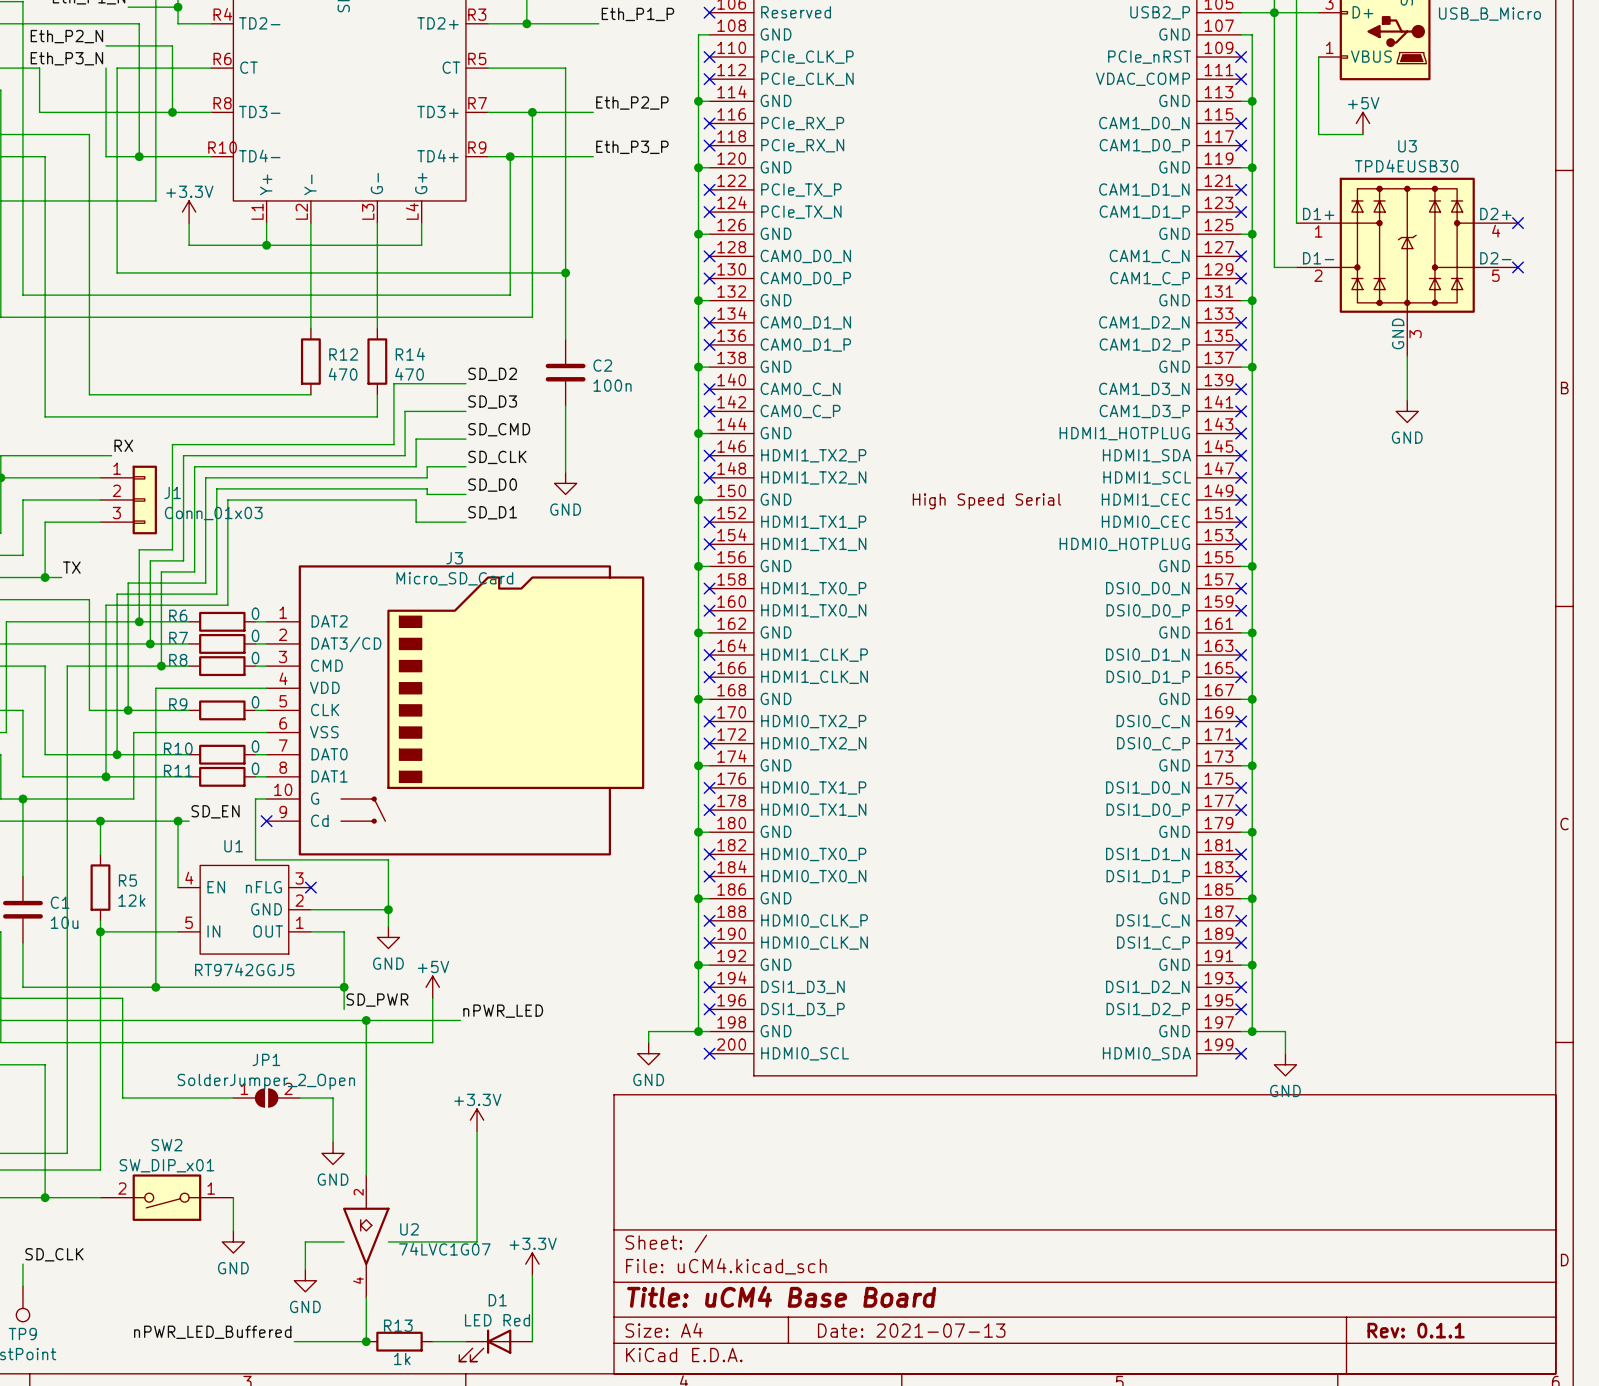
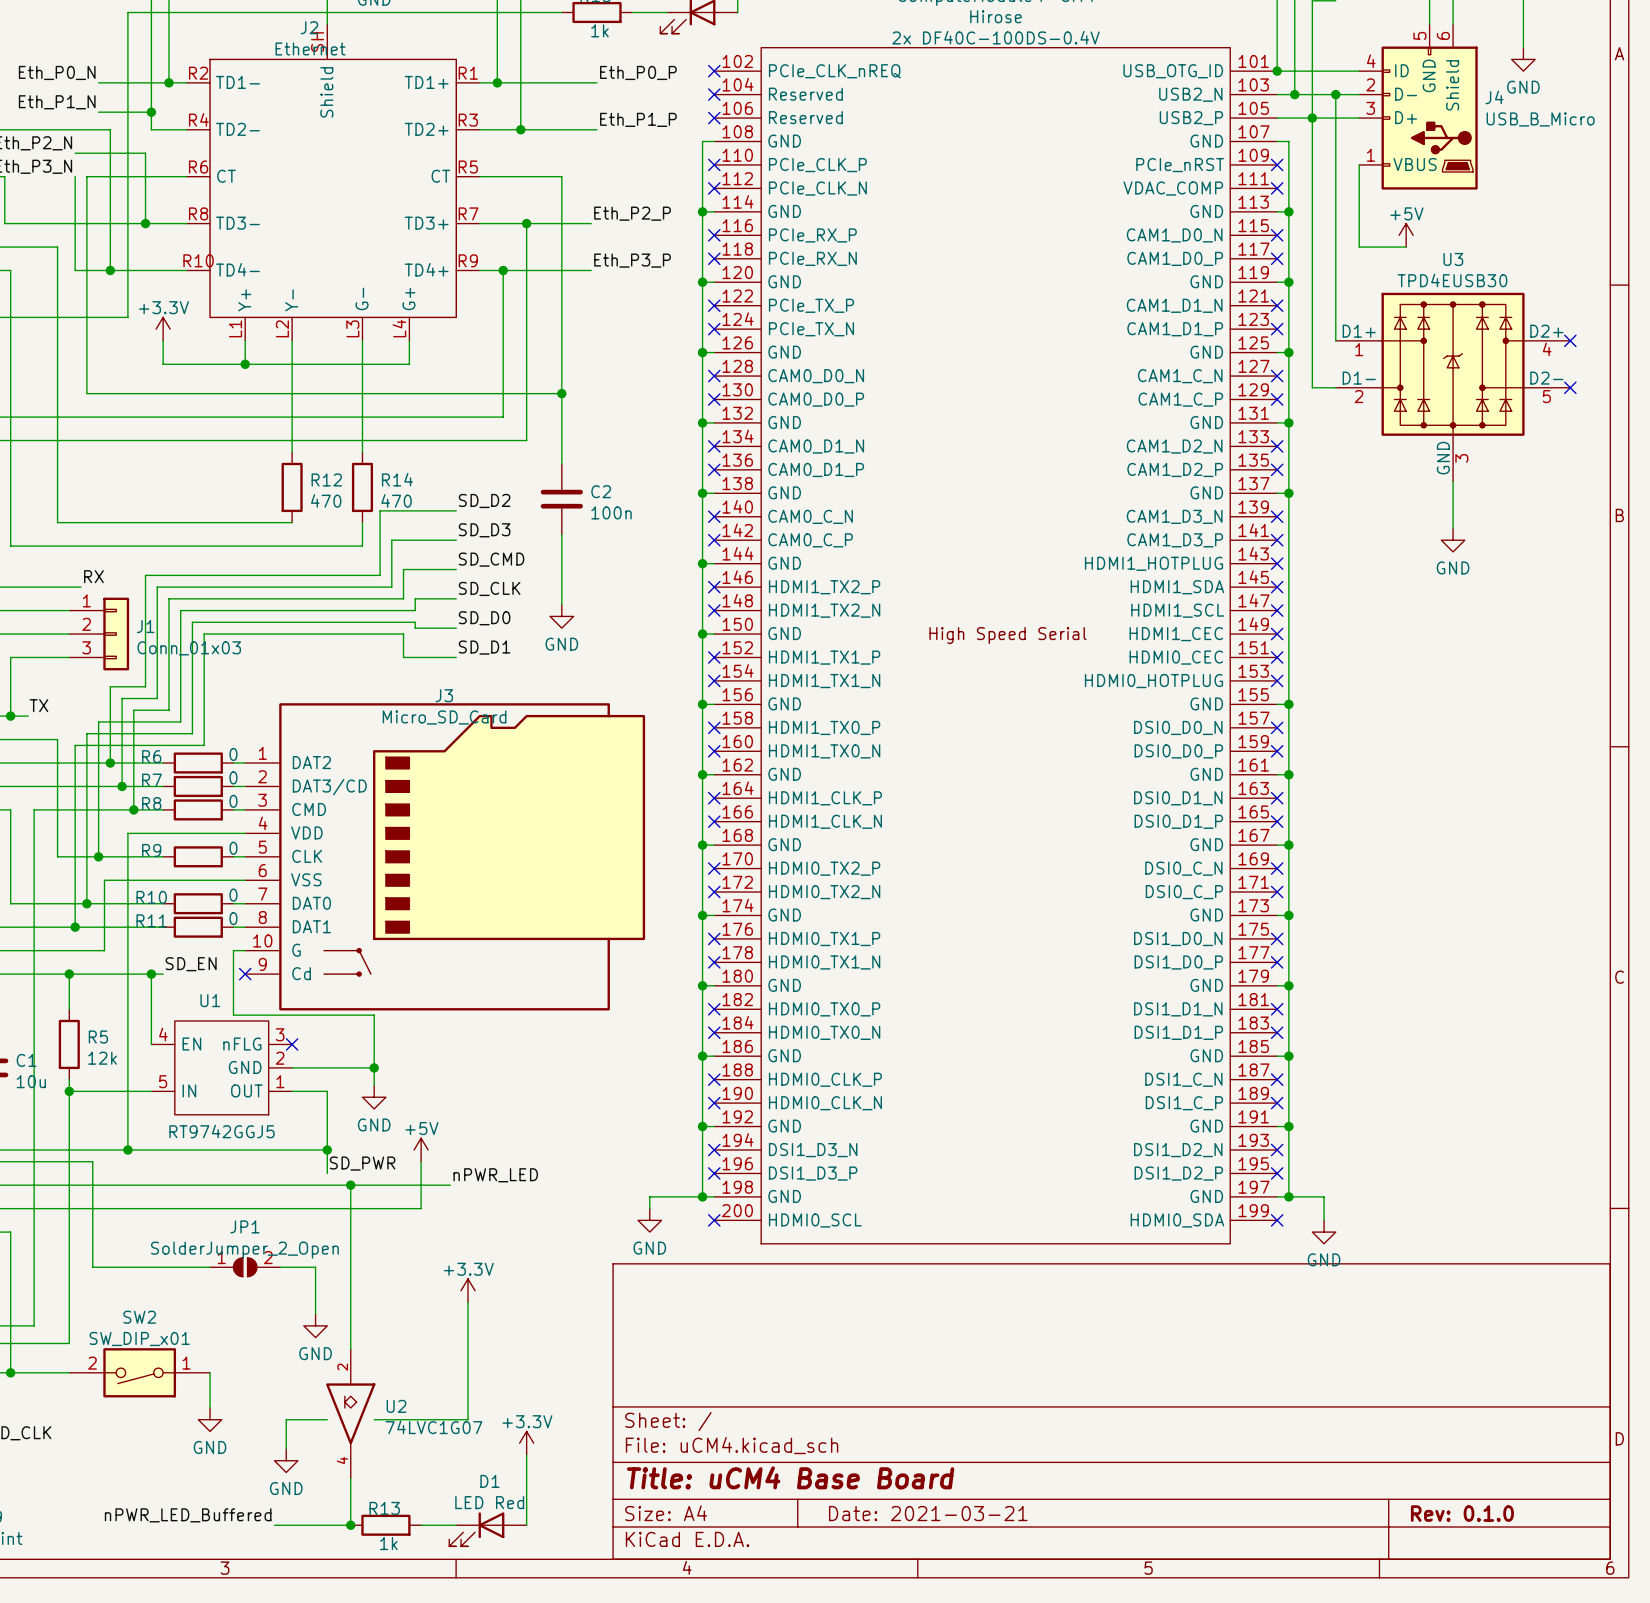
title block: Date: 2021-07-13 (911, 1330) -> Date: 2021-03-21 (928, 1513)
title block: Rev: 0.1.1 (1416, 1330) -> Rev: 0.1.0 (1462, 1513)

